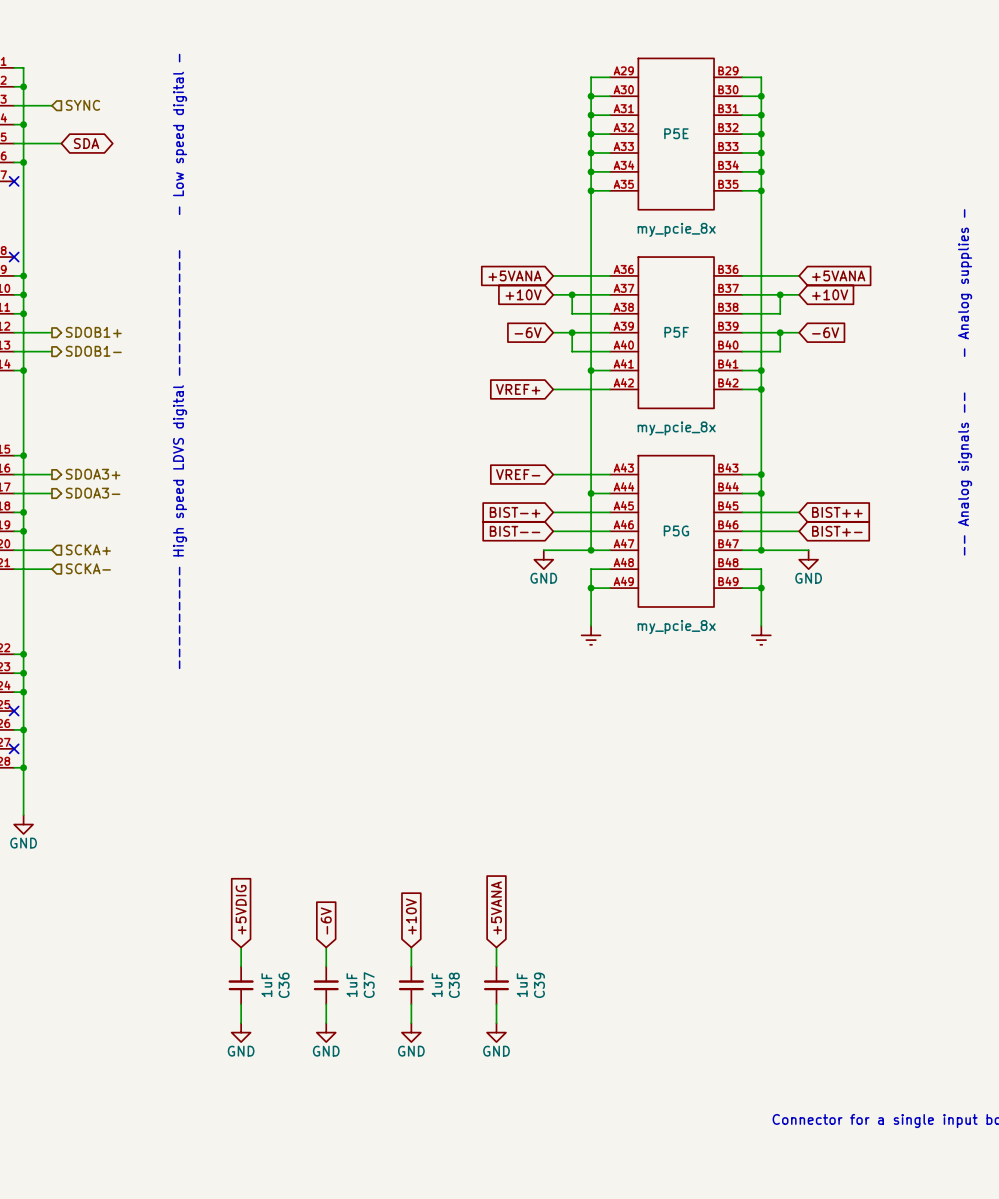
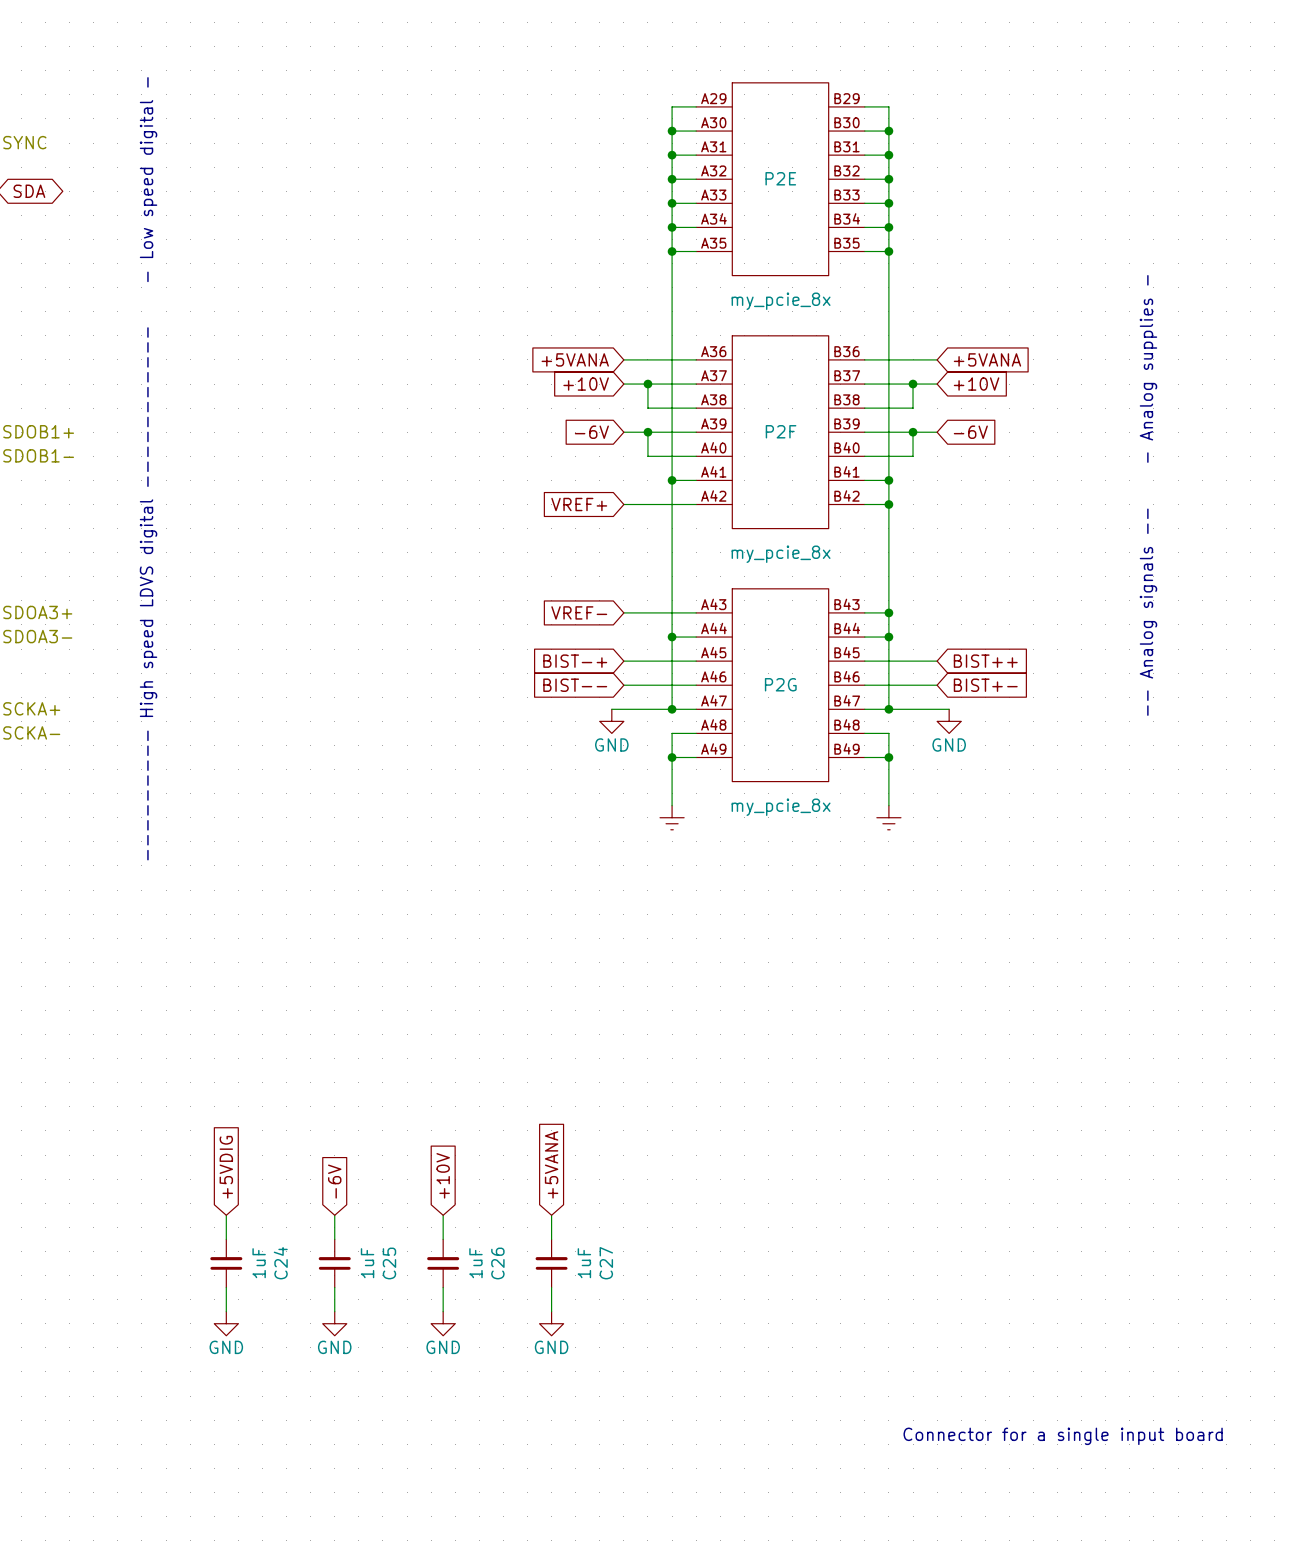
P5E name: P5E (676, 133) -> P2E (780, 178)
P5F name: P5F (676, 332) -> P2F (781, 431)
P5G name: P5G (676, 530) -> P2G (780, 684)
C36 name: C36 (284, 985) -> C24 (280, 1263)
C37 name: C37 (369, 985) -> C25 (389, 1263)
C38 name: C38 (454, 985) -> C26 (497, 1263)
C39 name: C39 (539, 985) -> C27 (606, 1263)

